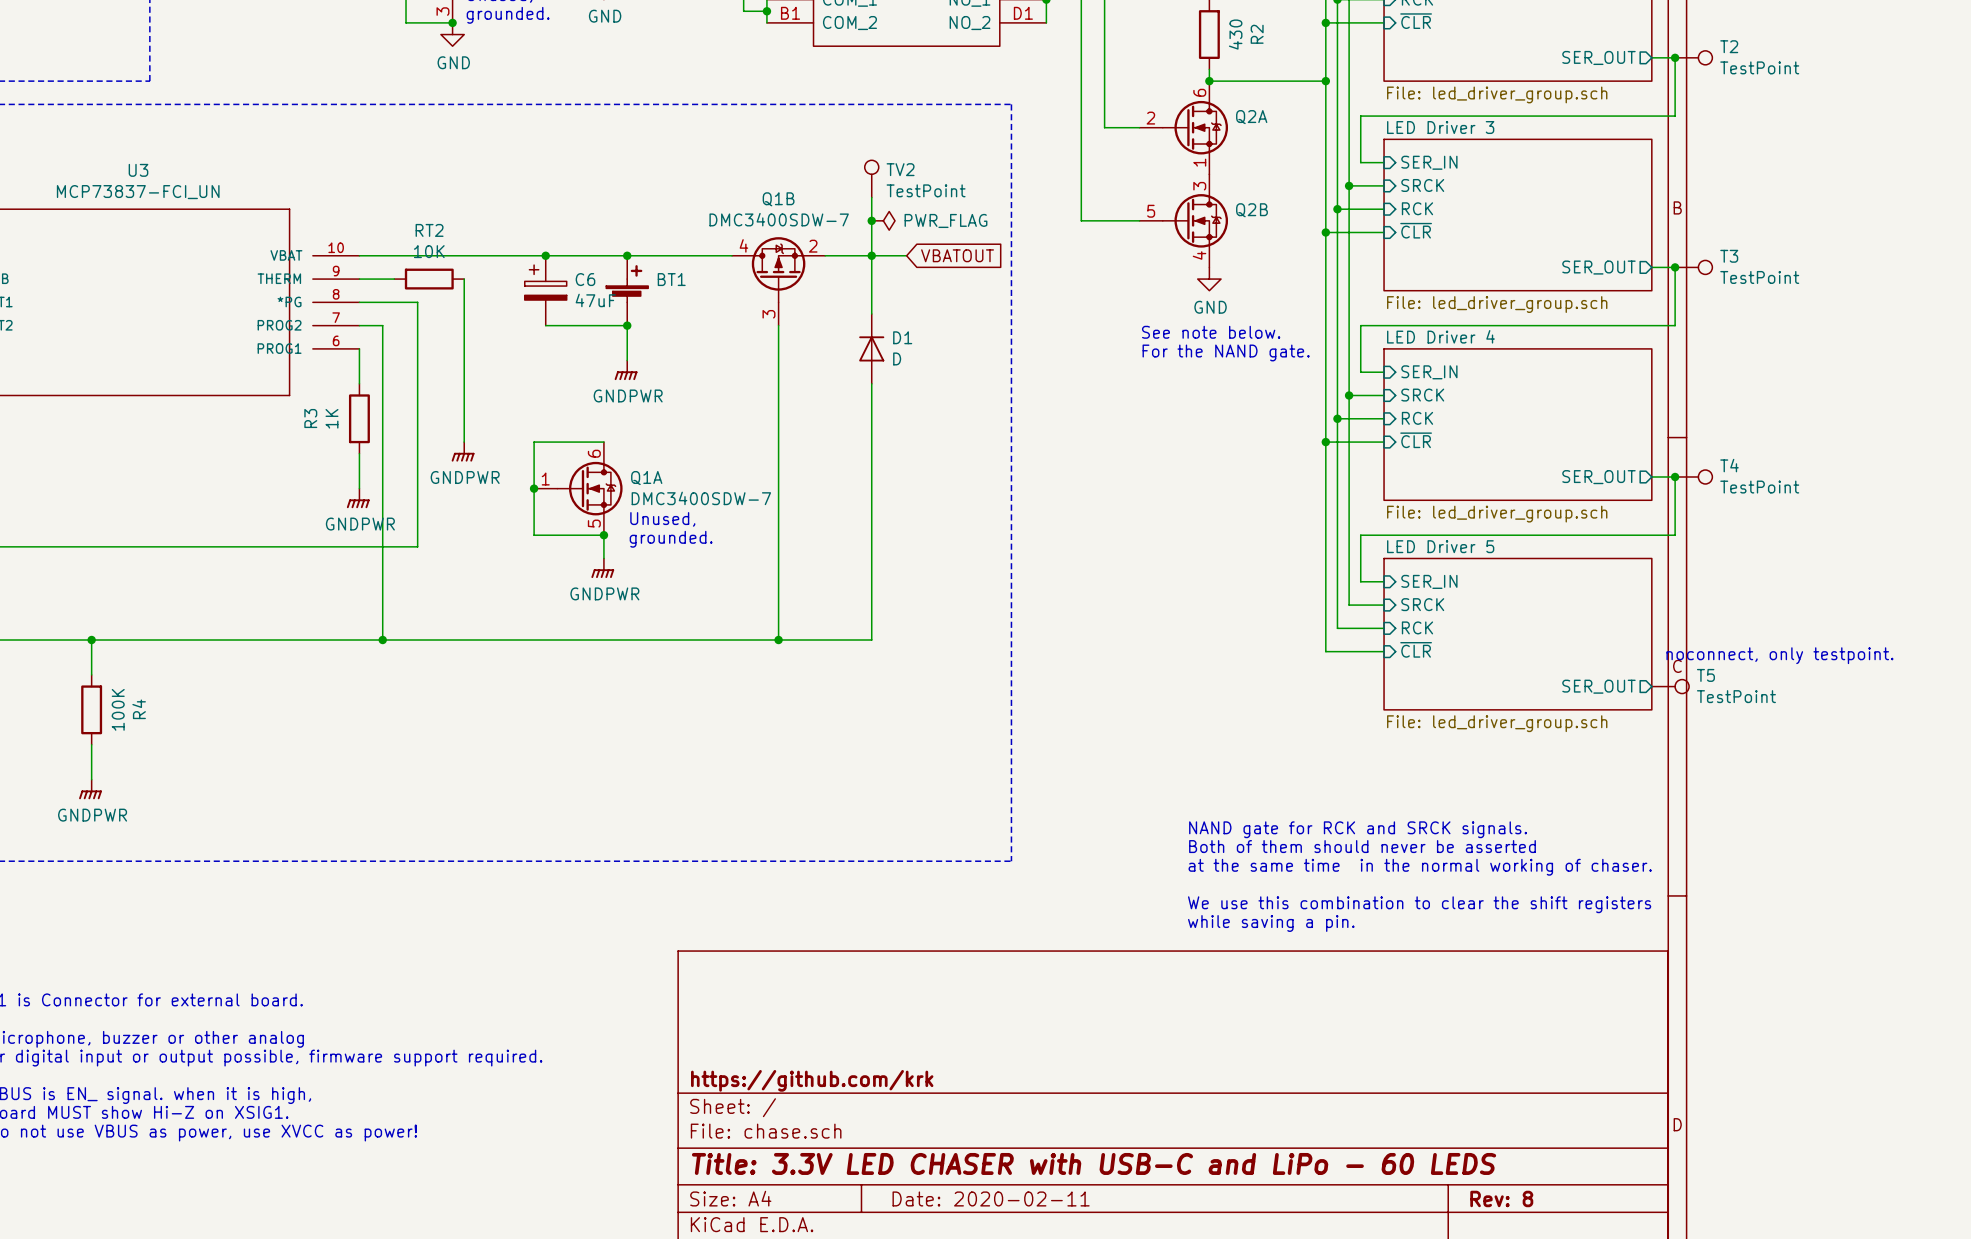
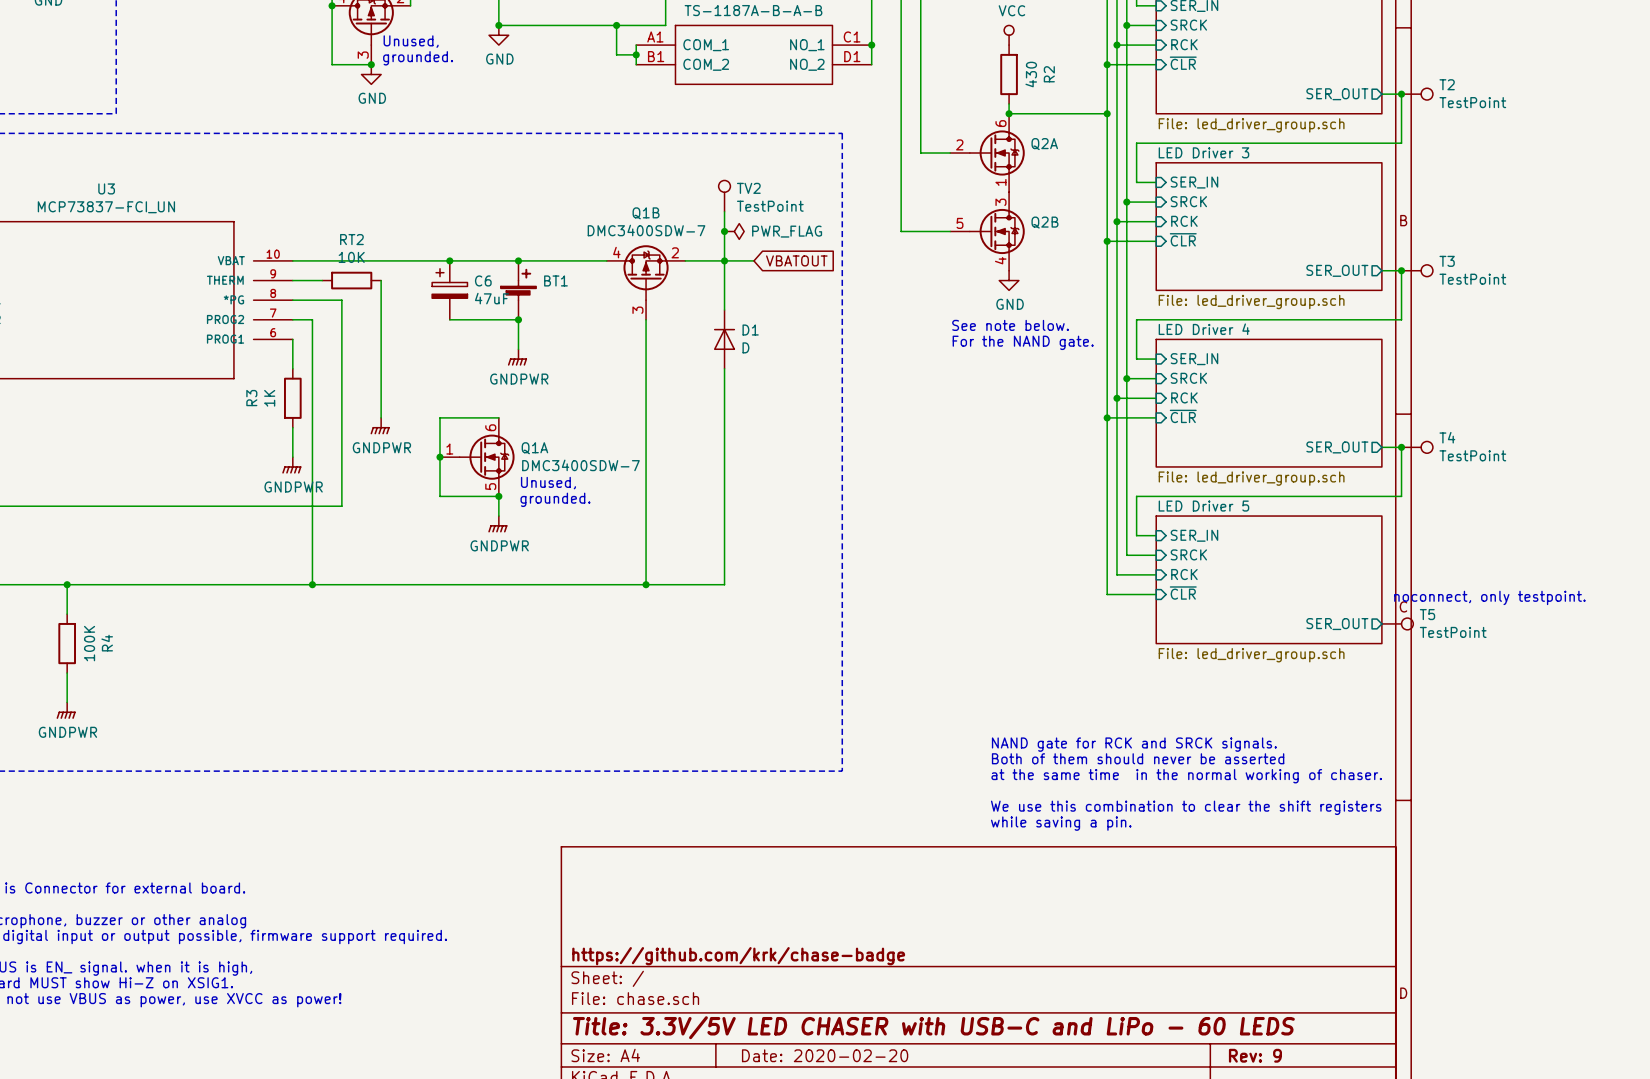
title block: https://github.com/krk (812, 1080) -> https://github.com/krk/chase-badge (738, 956)
title block: Title: 3.3V LED CHASER with USB-C and LiPo - 60 LEDS (1094, 1163) -> Title: 3.3V/5V LED CHASER with USB-C and LiPo - 60 LEDS (933, 1027)
title block: Date: 2020-02-11 (991, 1198) -> Date: 2020-02-20 (825, 1055)
title block: Rev: 8 (1501, 1198) -> Rev: 9 (1255, 1055)

